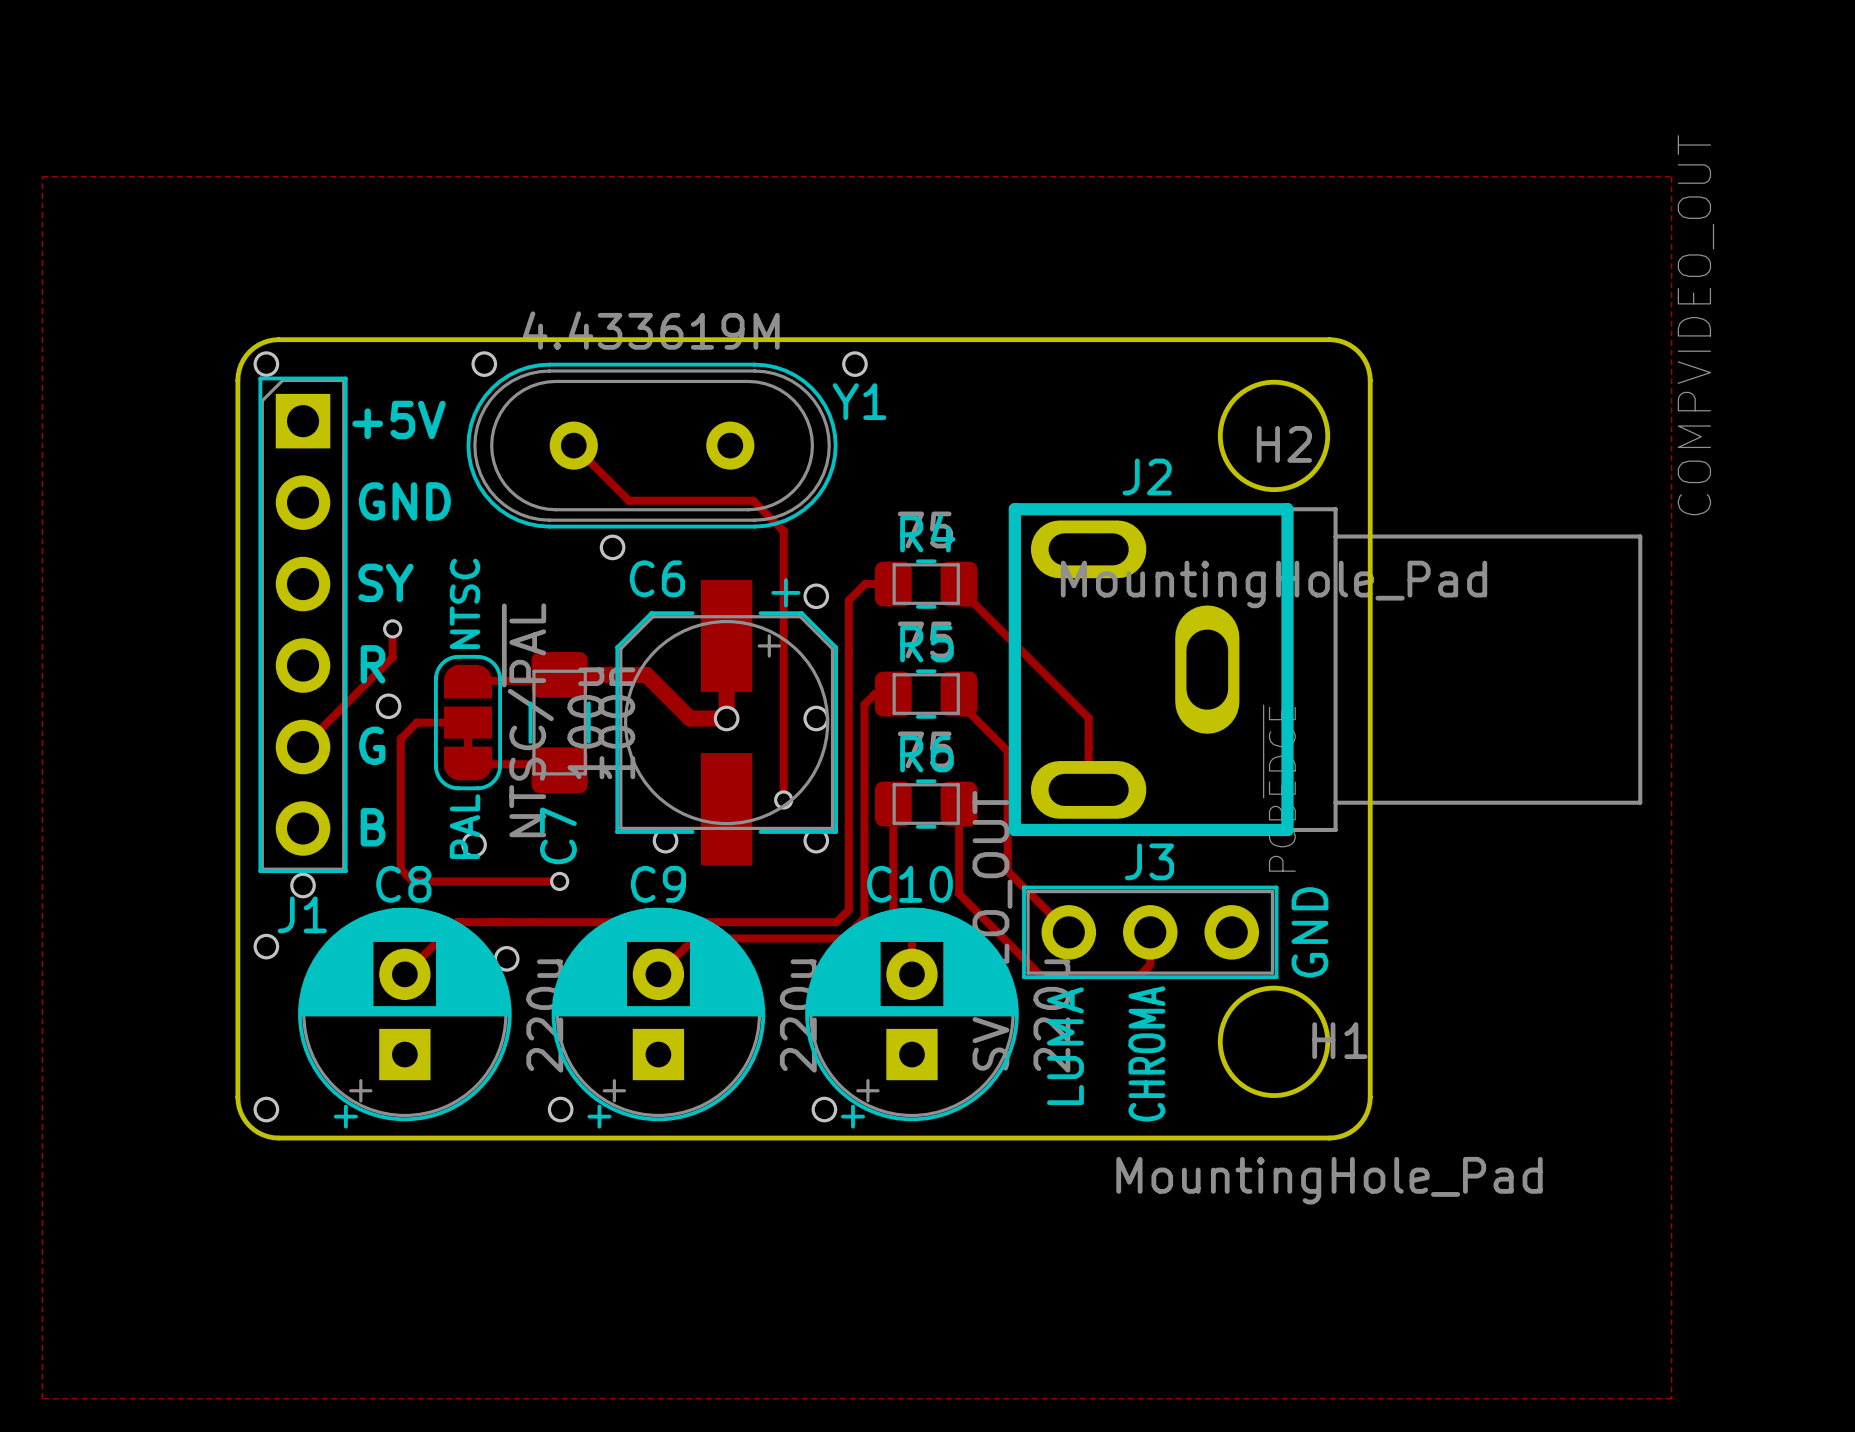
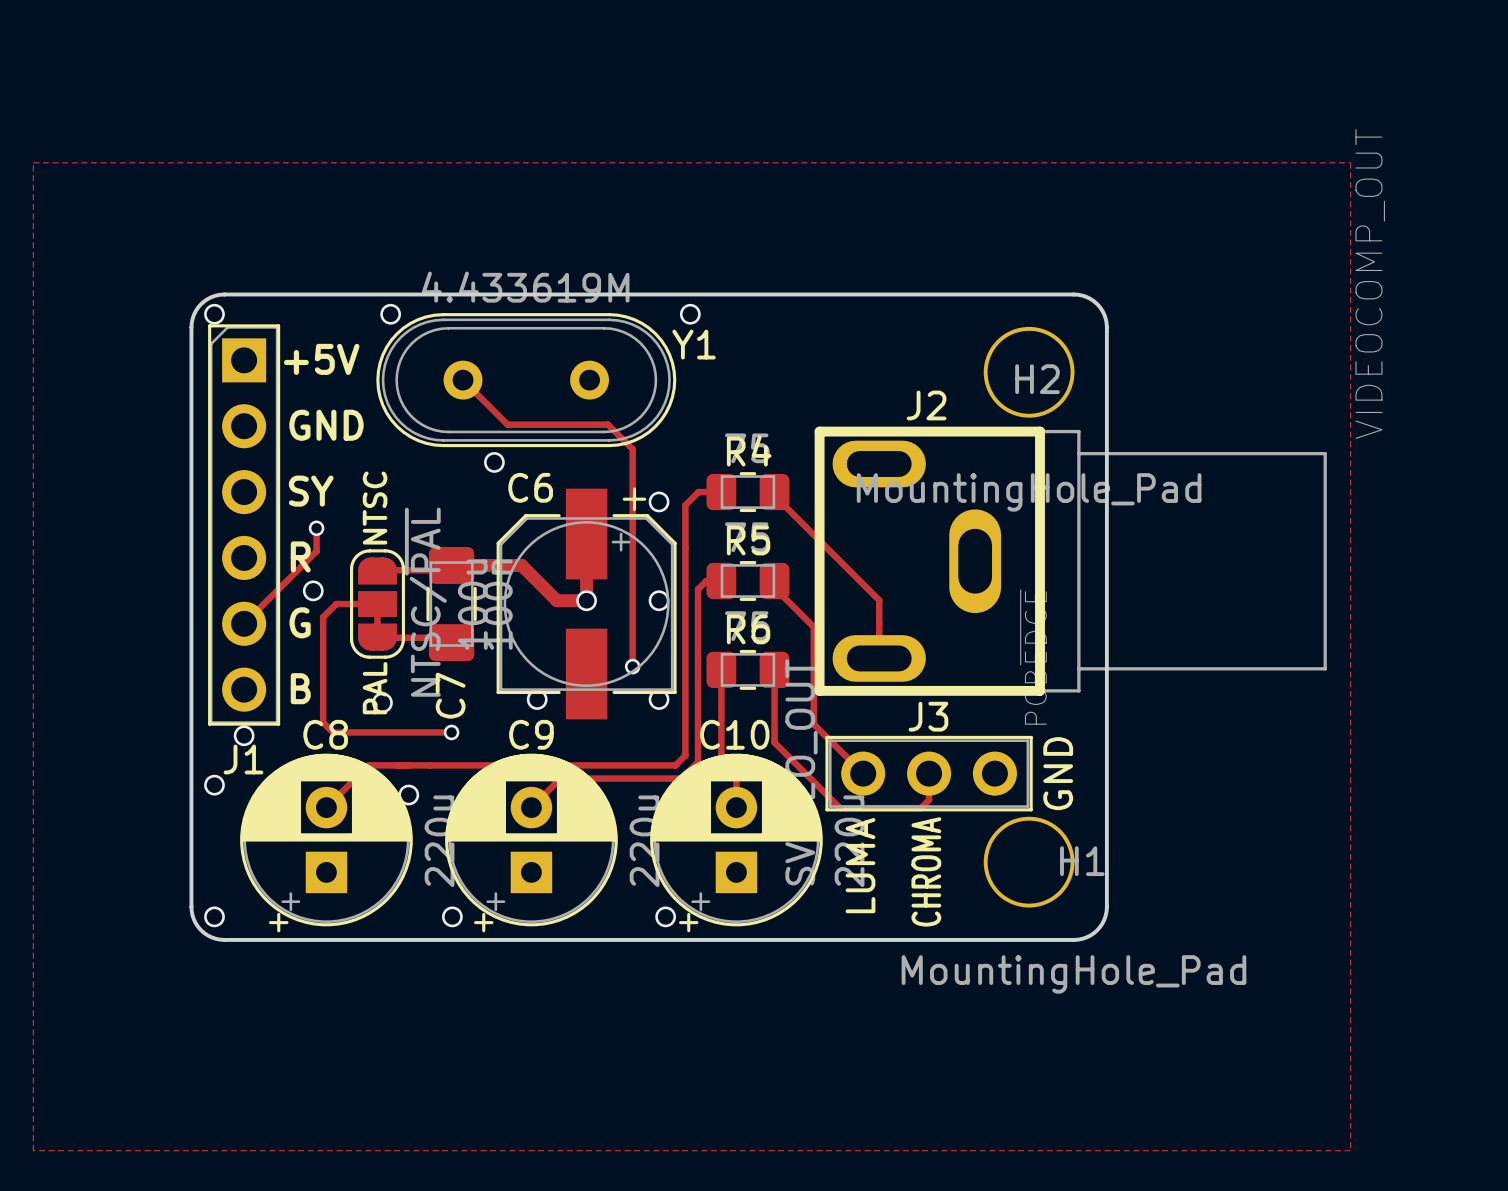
J2 value: COMPVIDEO_OUT (1695, 325) -> VIDEOCOMP_OUT (1370, 284)

